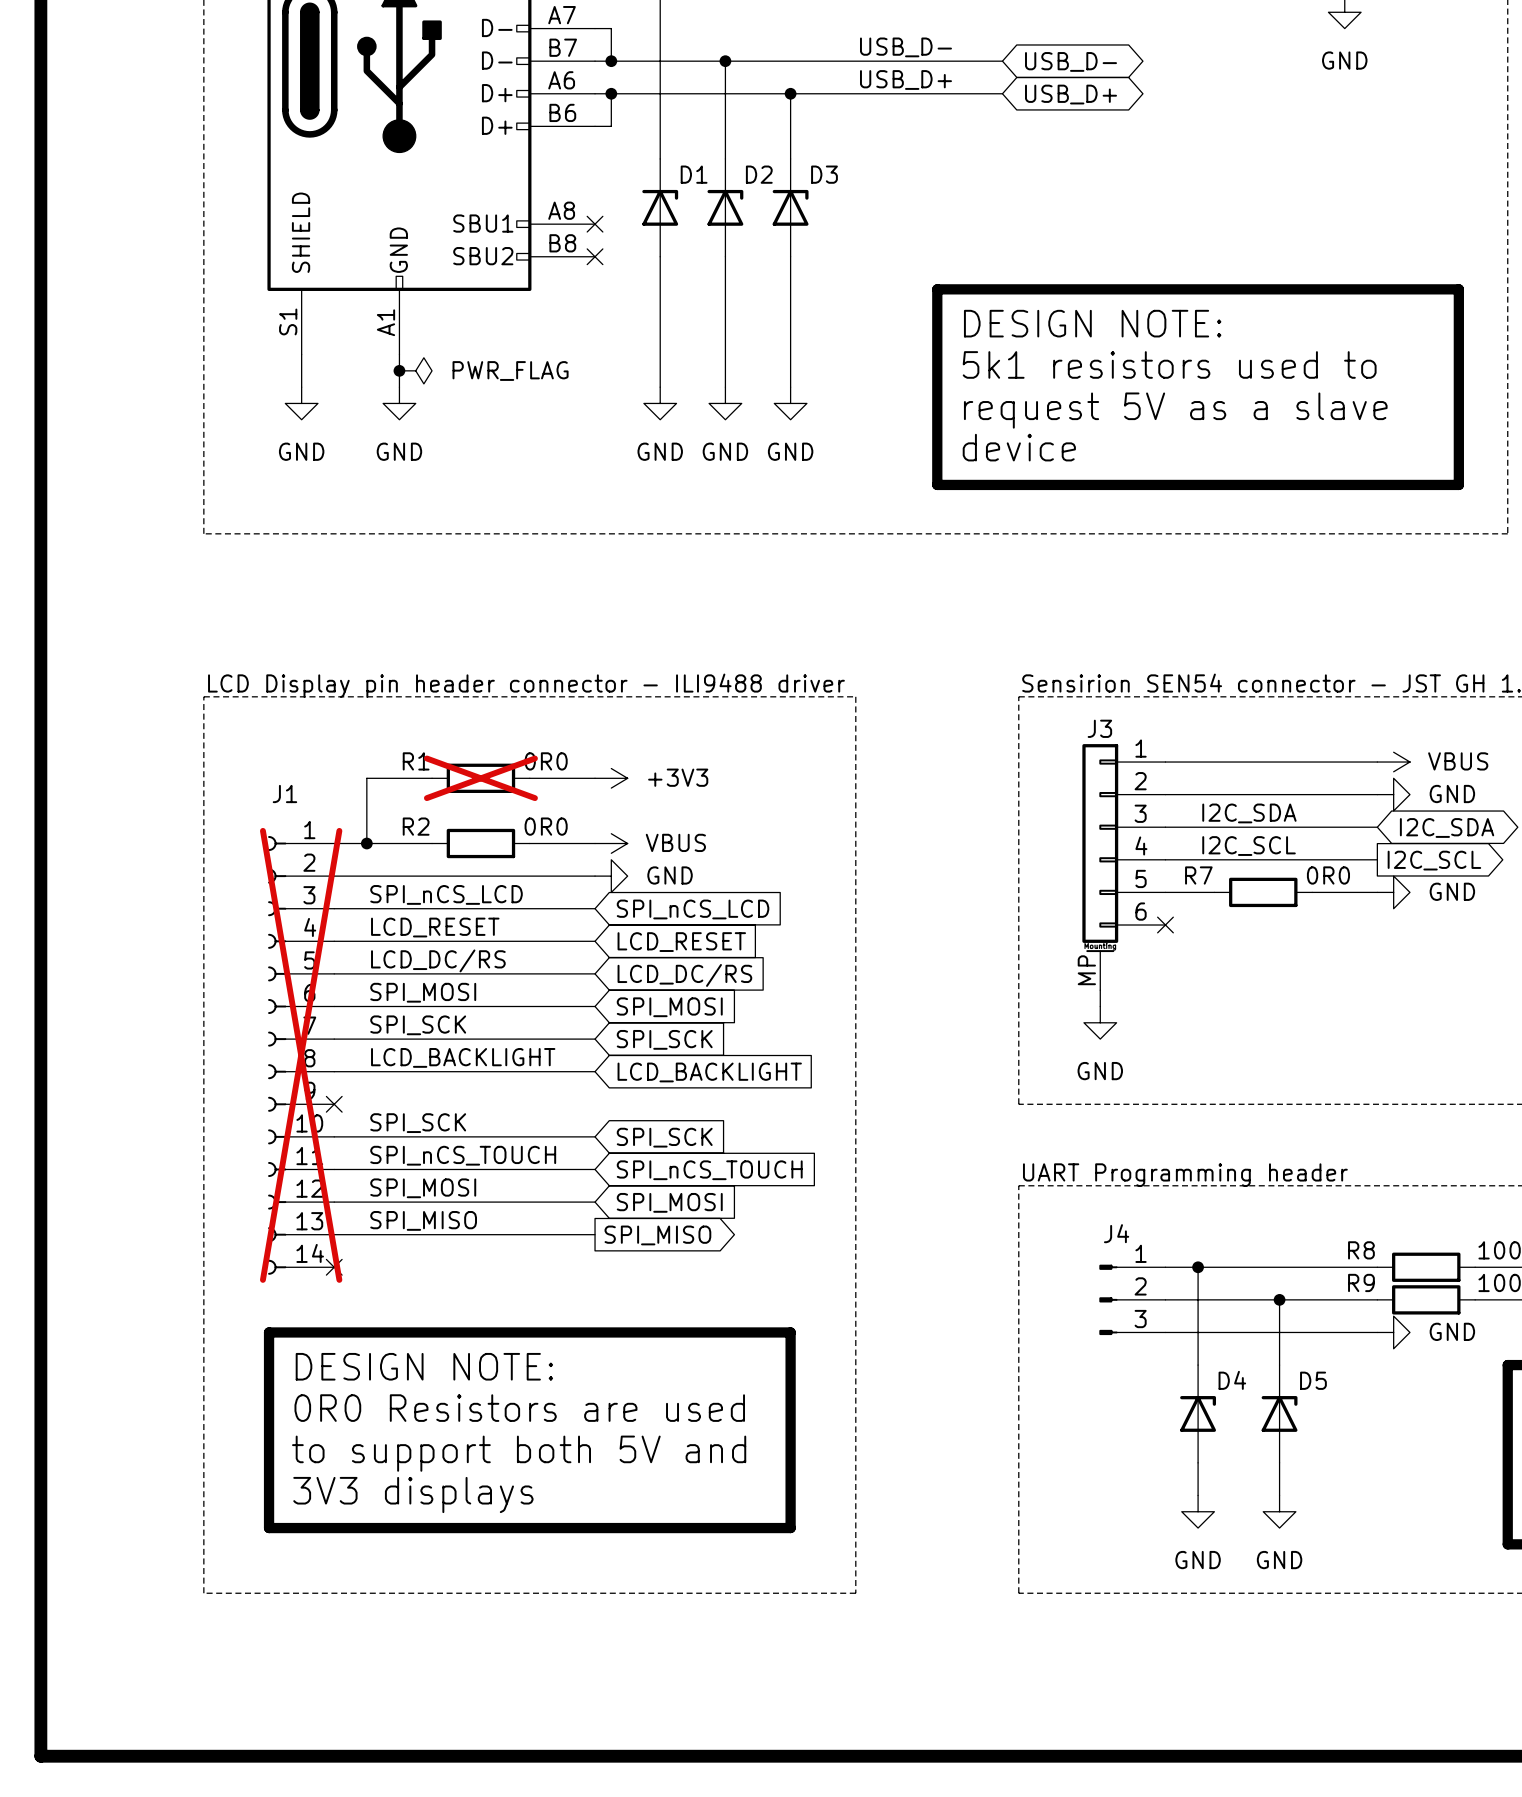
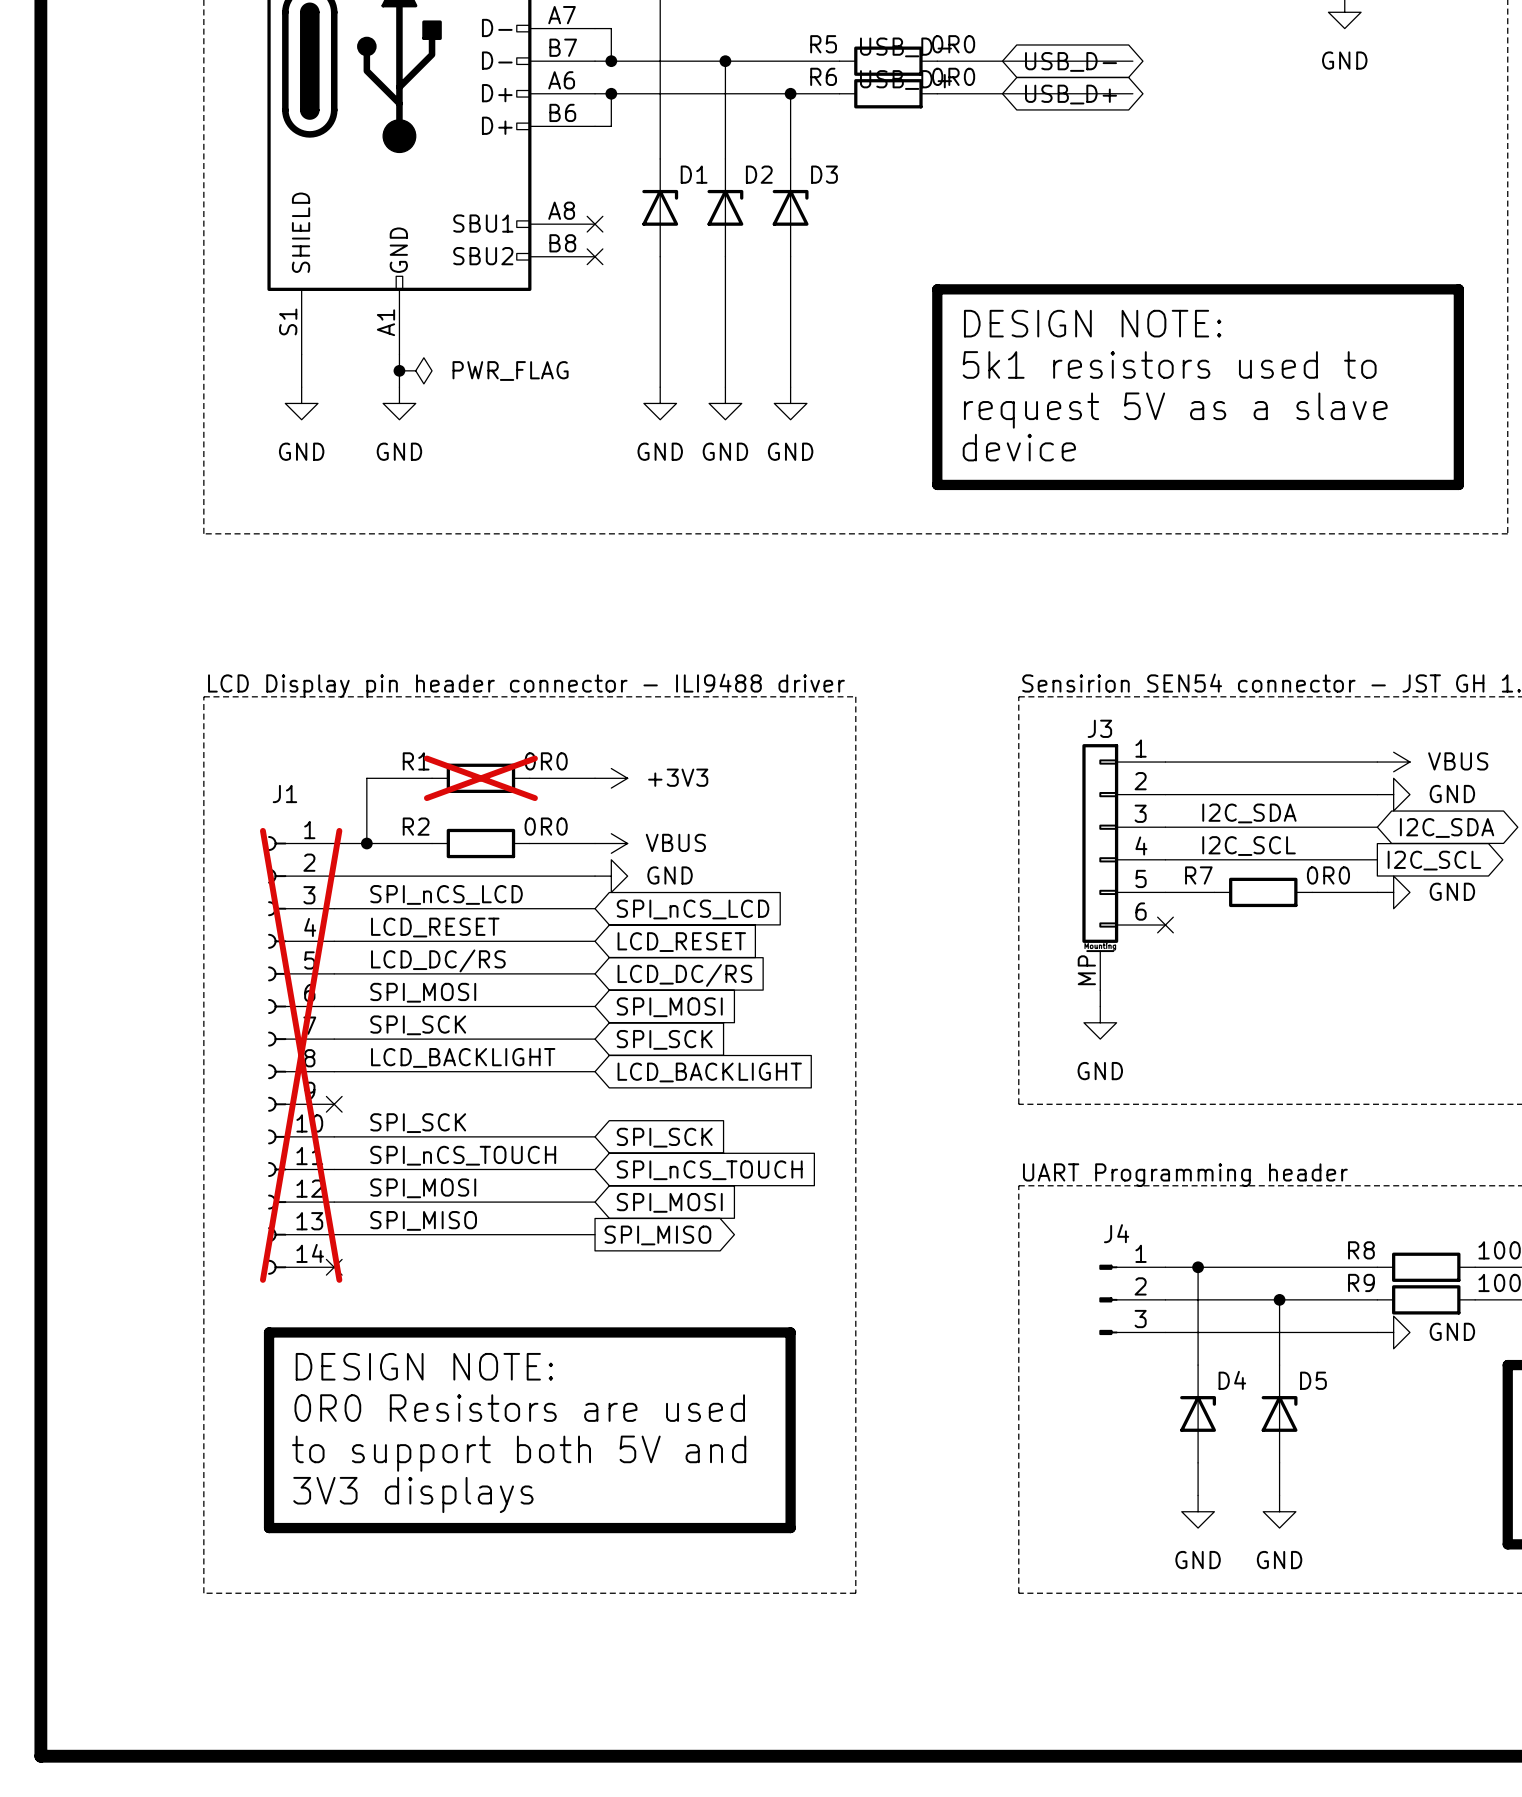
wire: (839, 61) (937, 61) -> none
R5: none -> 0R0 (888, 61)
wire: none -> (1002, 61) (1132, 61)
wire: (839, 93) (937, 93) -> none
R6: none -> 0R0 (888, 93)
wire: none -> (1002, 93) (1132, 93)

